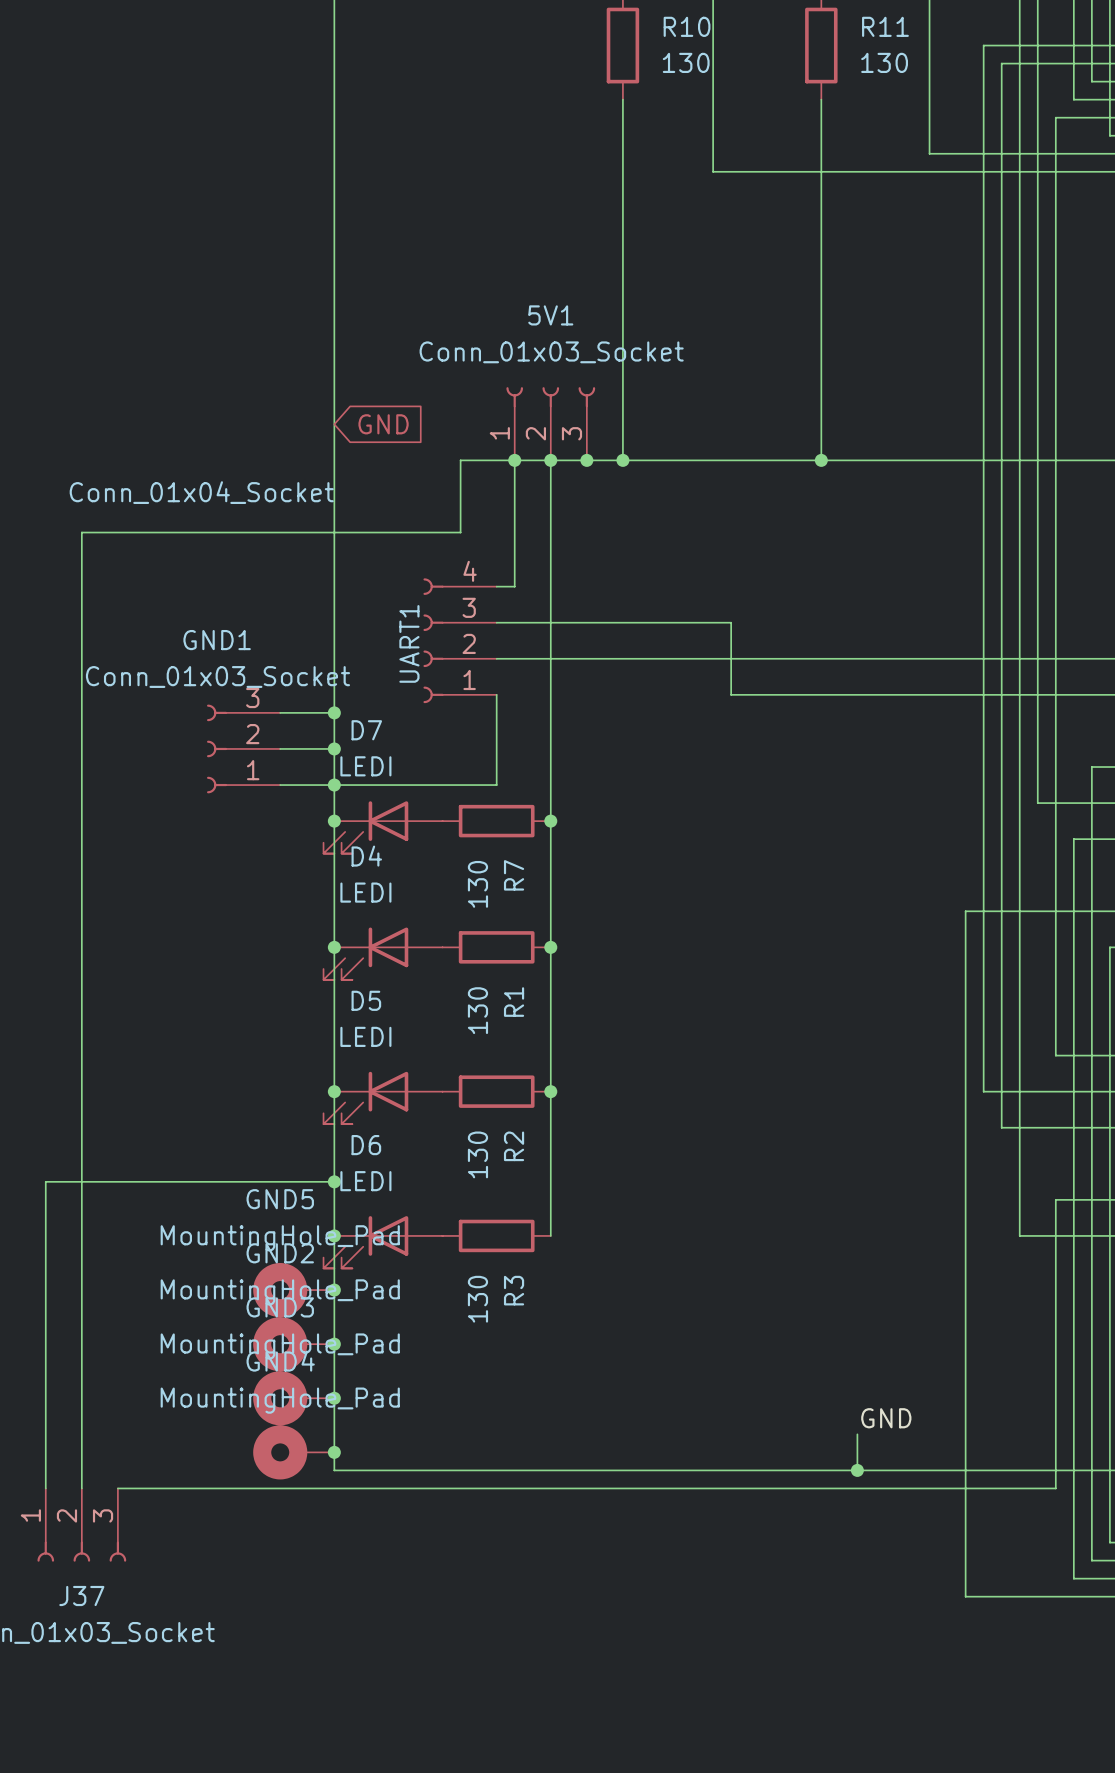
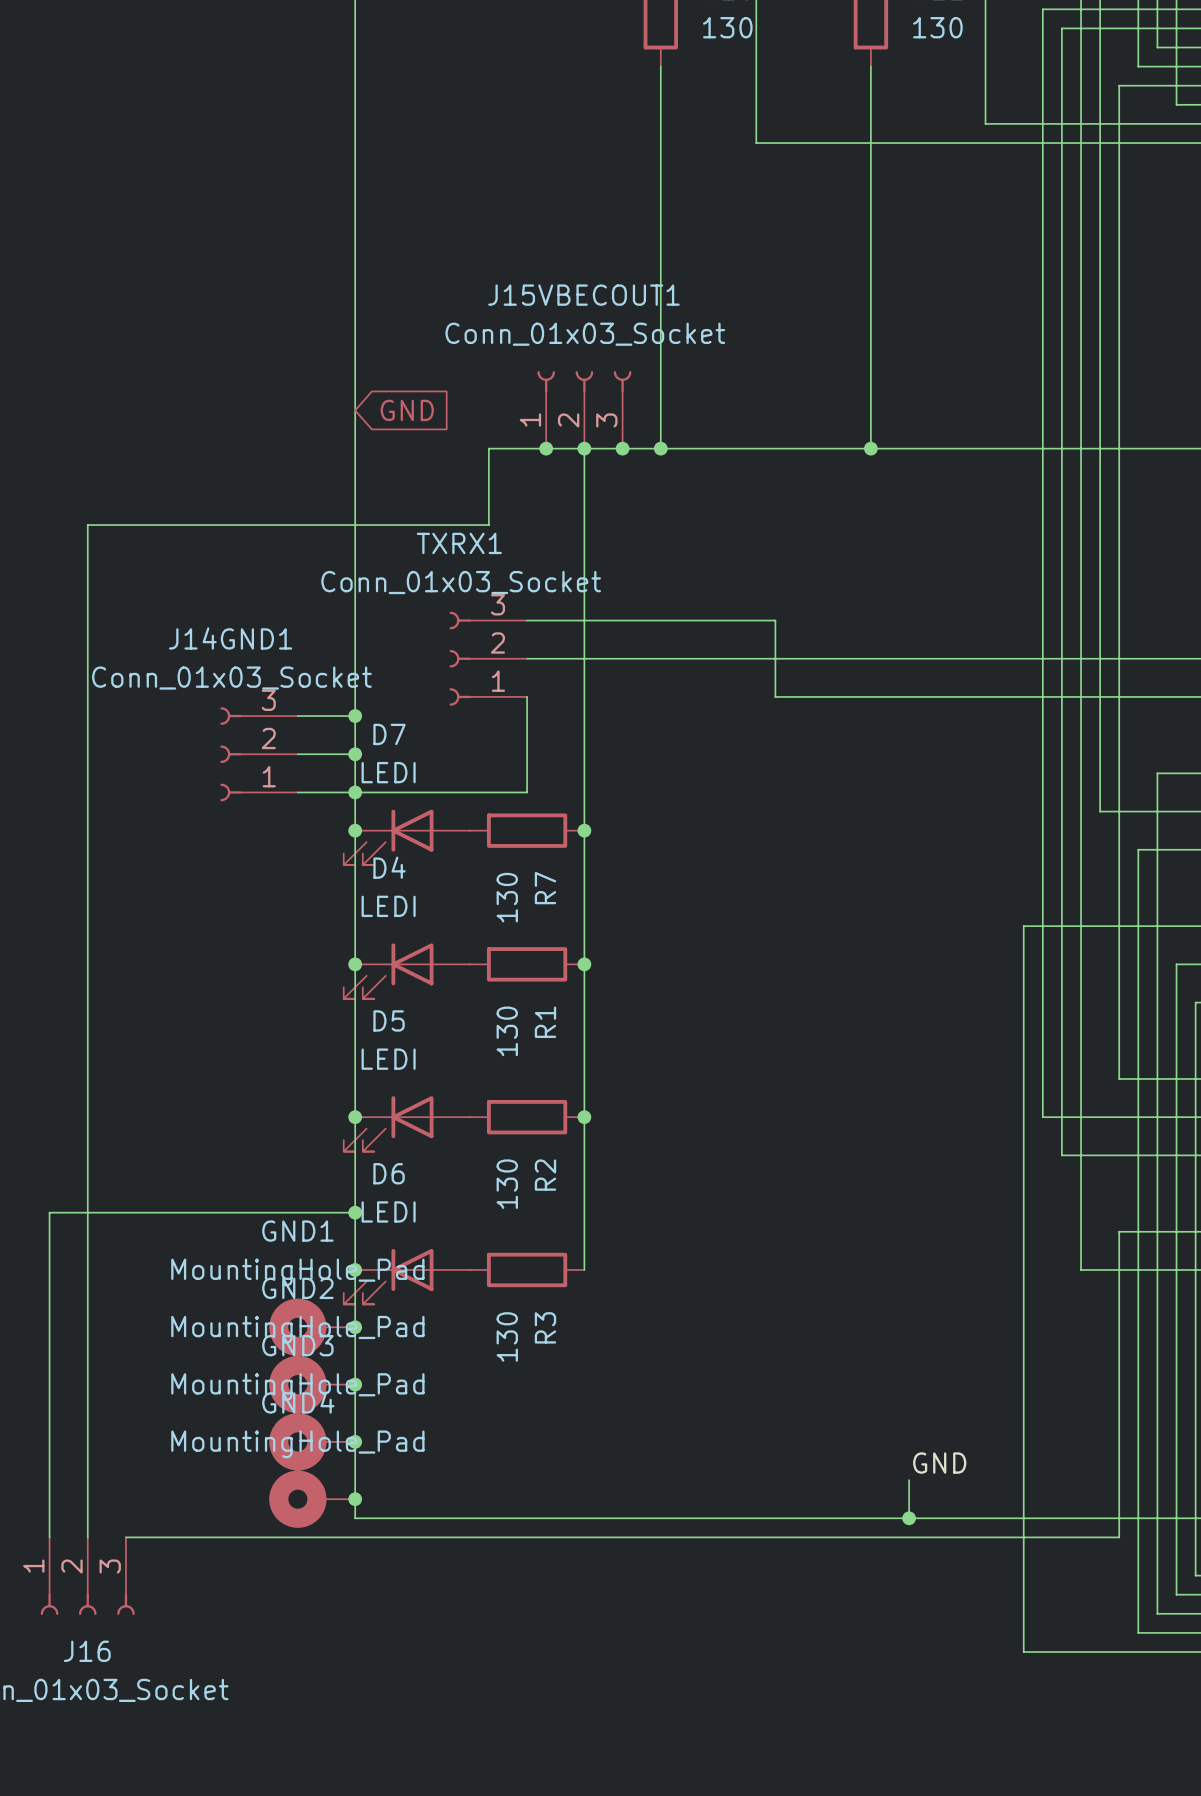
5V1 name: 5V1 (550, 315) -> J15VBECOUT1 (583, 295)
wire: (514, 460) (514, 586) (496, 586) -> none
GND1 name: GND1 (217, 640) -> J14GND1 (230, 638)
UART1: Conn_01x04_Socket (460, 640) -> none
TXRX1: none -> Conn_01x03_Socket (488, 658)
GND5 name: GND5 (280, 1199) -> GND1 (297, 1231)
J37 name: J37 (81, 1596) -> J16 (87, 1651)

